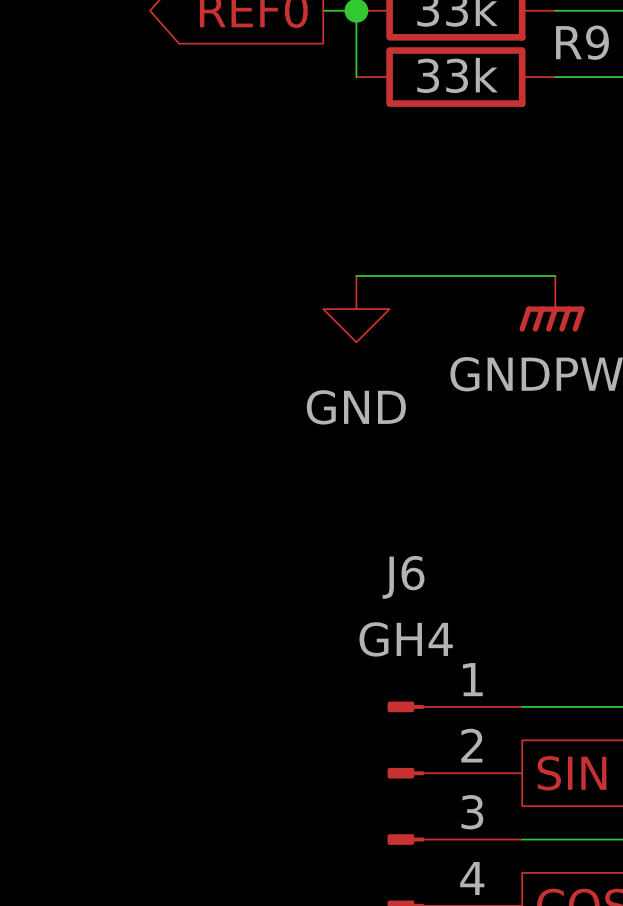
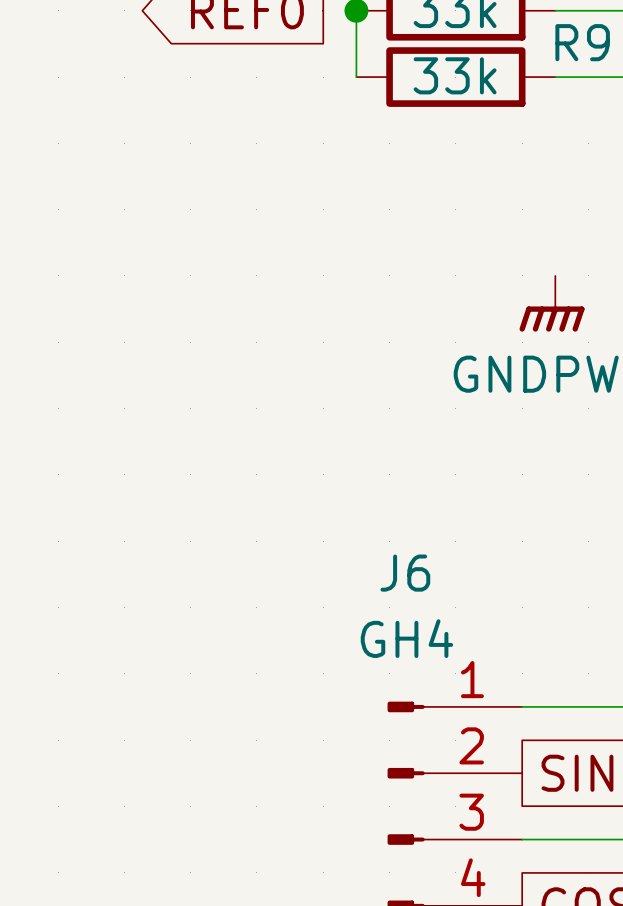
wire: (323, 10) (356, 10) -> none
wire: (356, 275) (555, 275) -> none
power symbol: GND (356, 309) -> none

